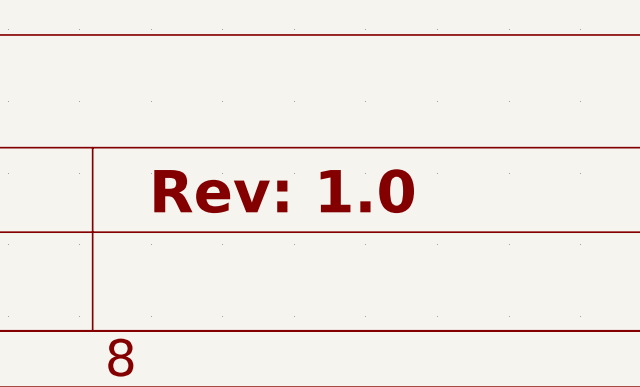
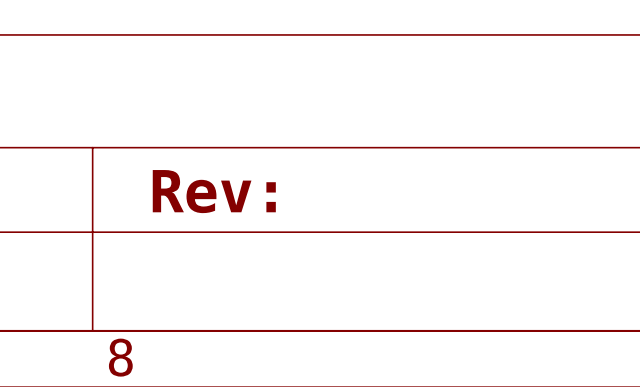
title block: Rev: 1.0 (284, 191) -> Rev: (214, 191)

